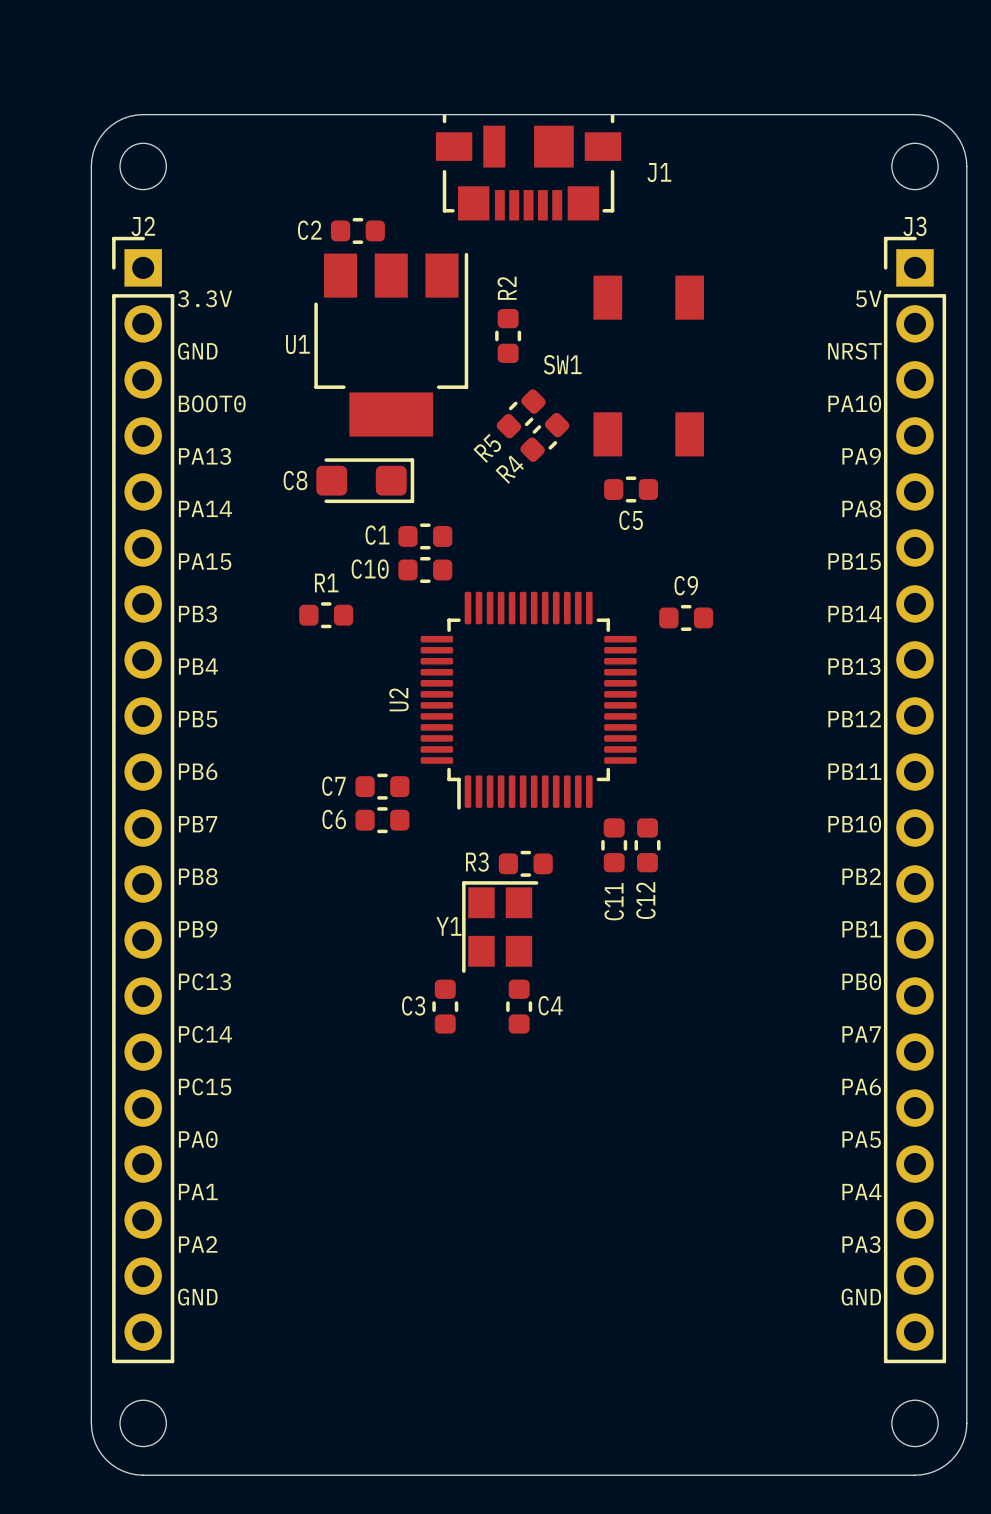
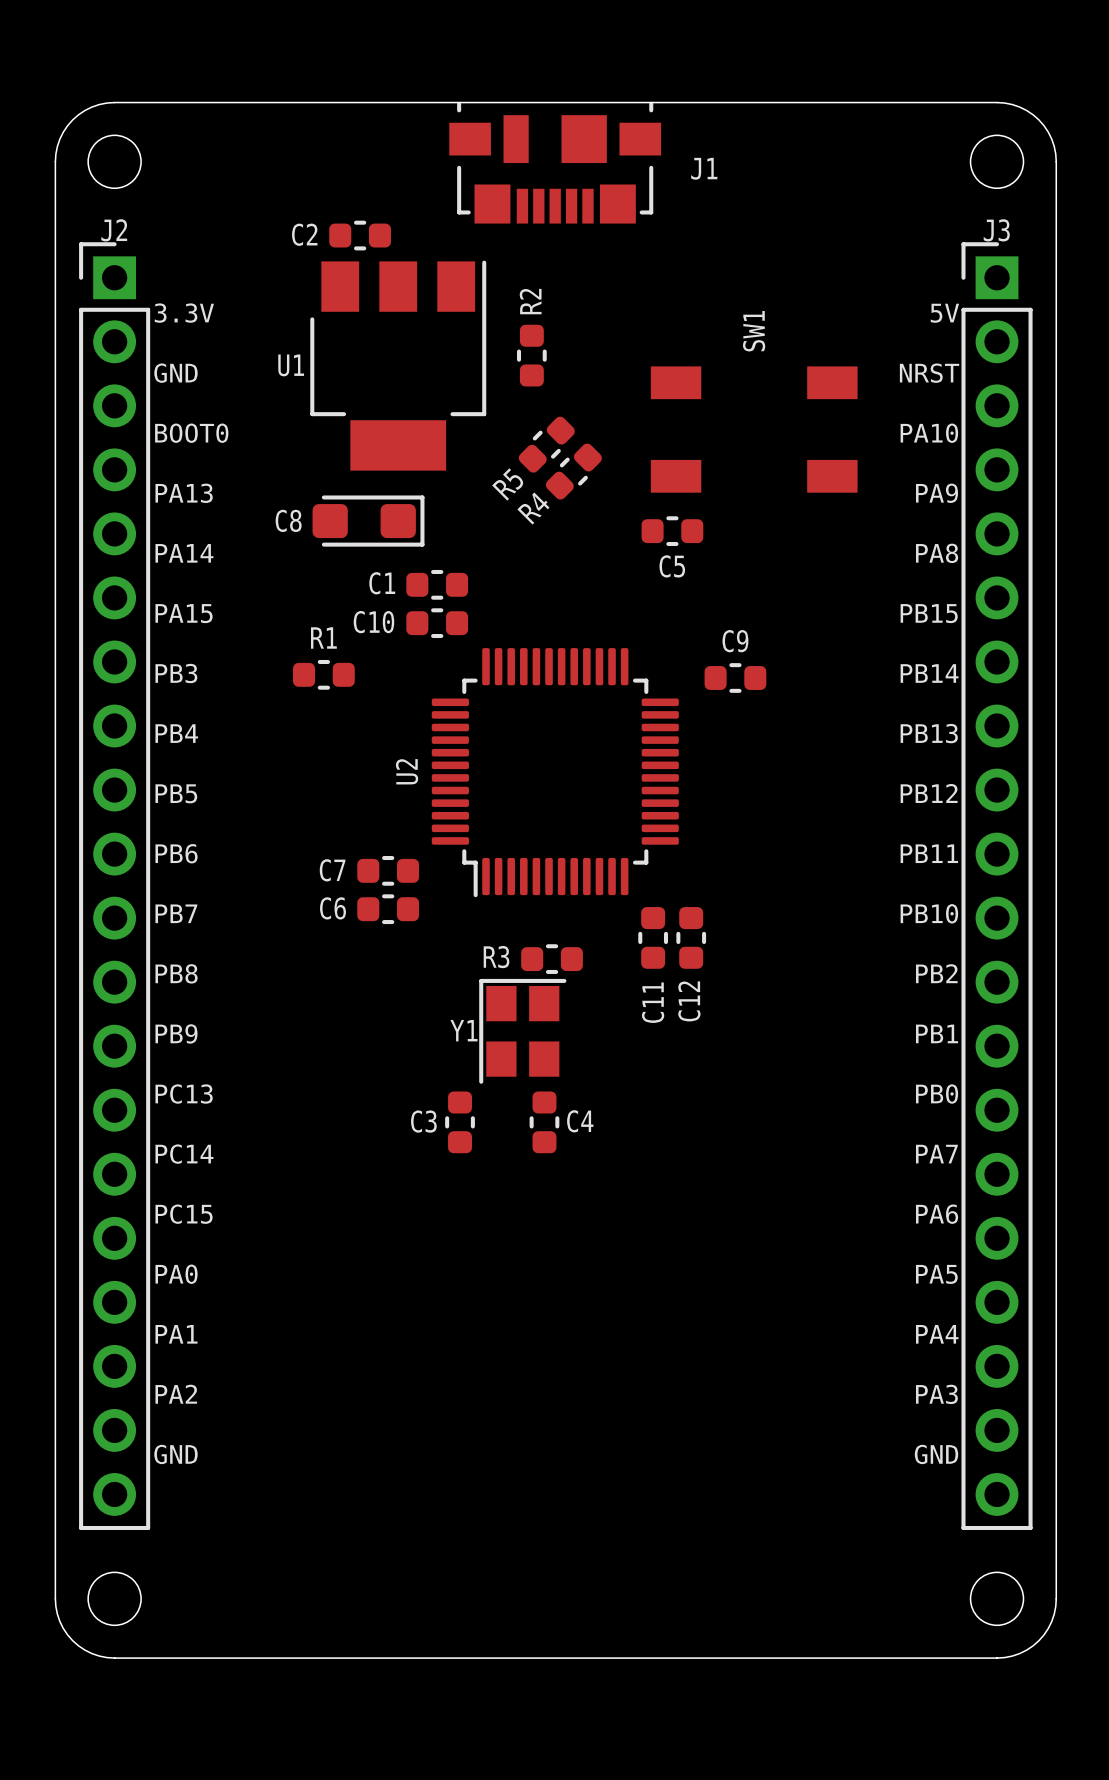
SW1 rotation: 0° (648, 366) -> 90° clockwise (754, 429)

